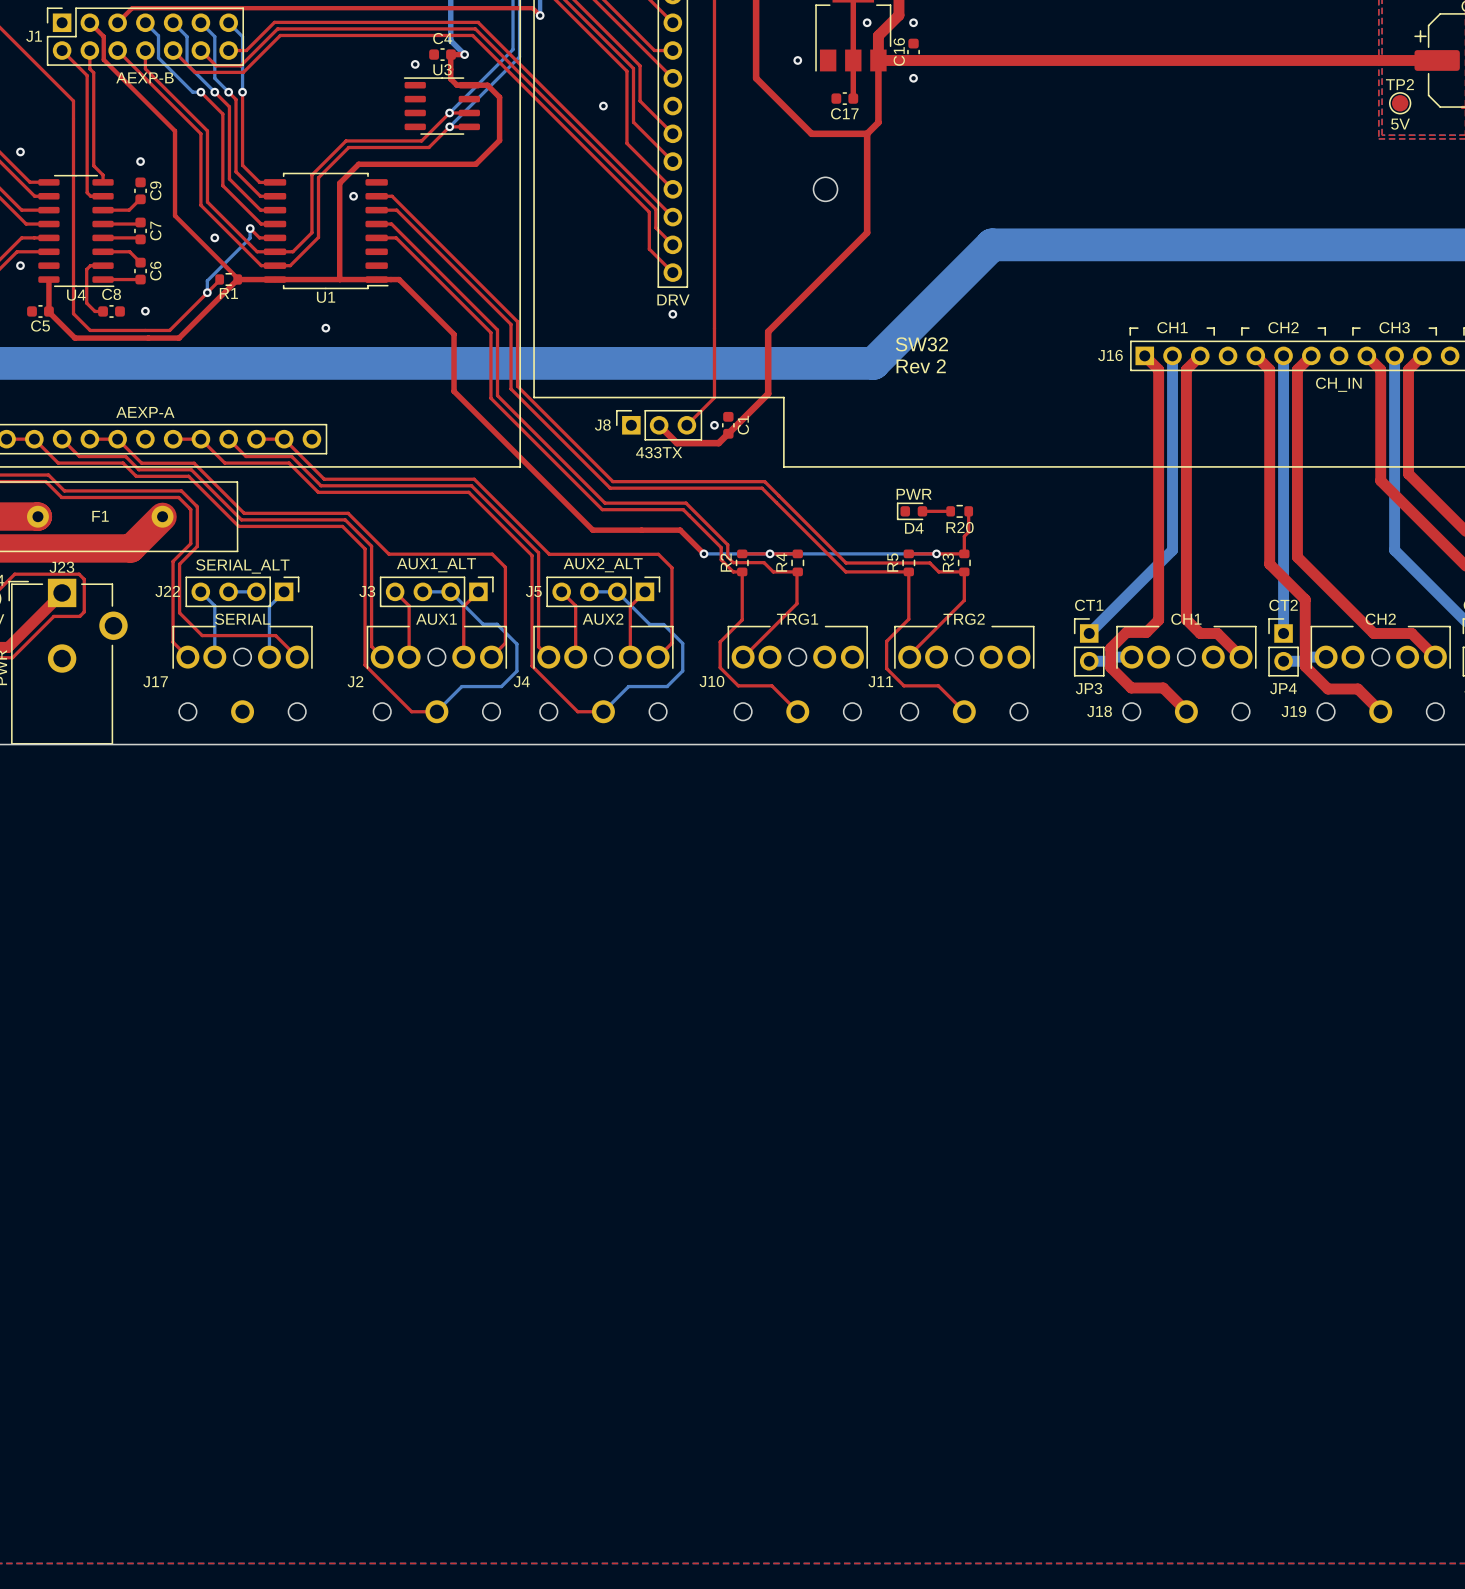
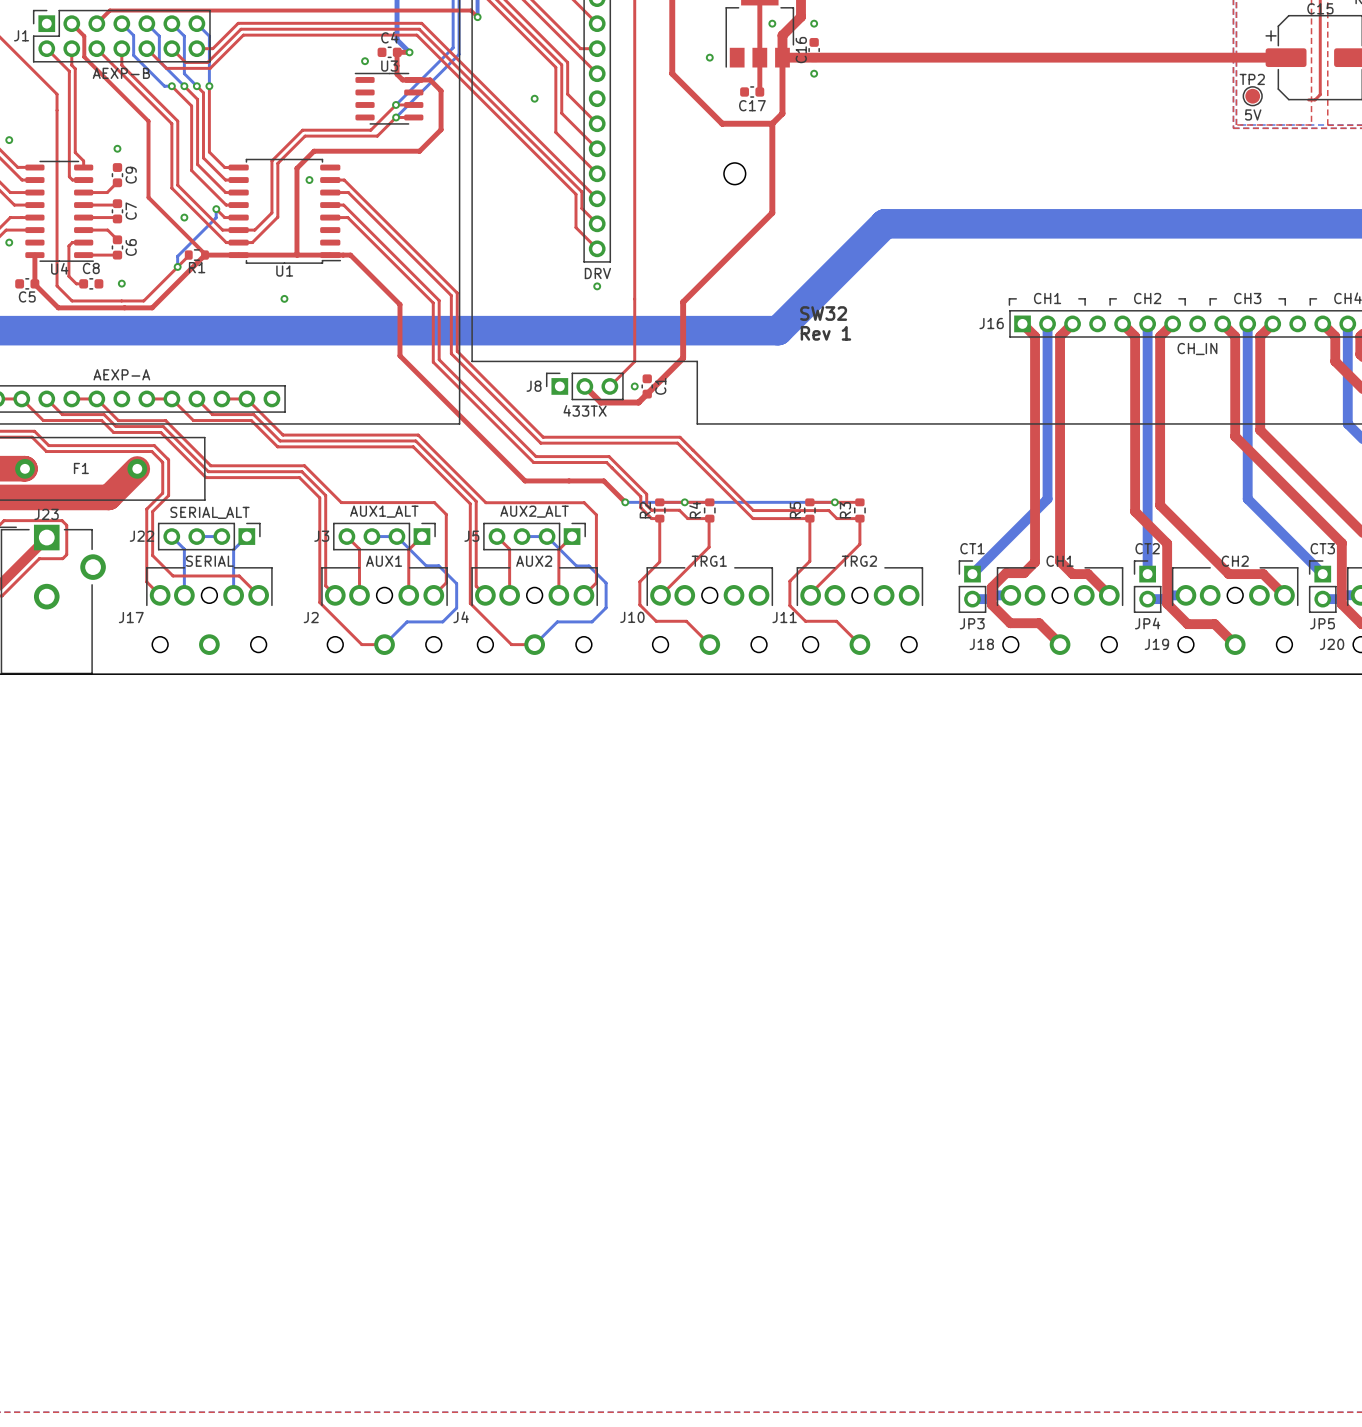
text: Rev 2 (921, 366) -> Rev 1 (825, 333)
D4: PWR (912, 511) -> none
top track: (922, 511) (950, 511) -> none
R20: (959, 511) -> none
top track: (968, 511) (968, 531) (964, 536) (964, 553) -> none

